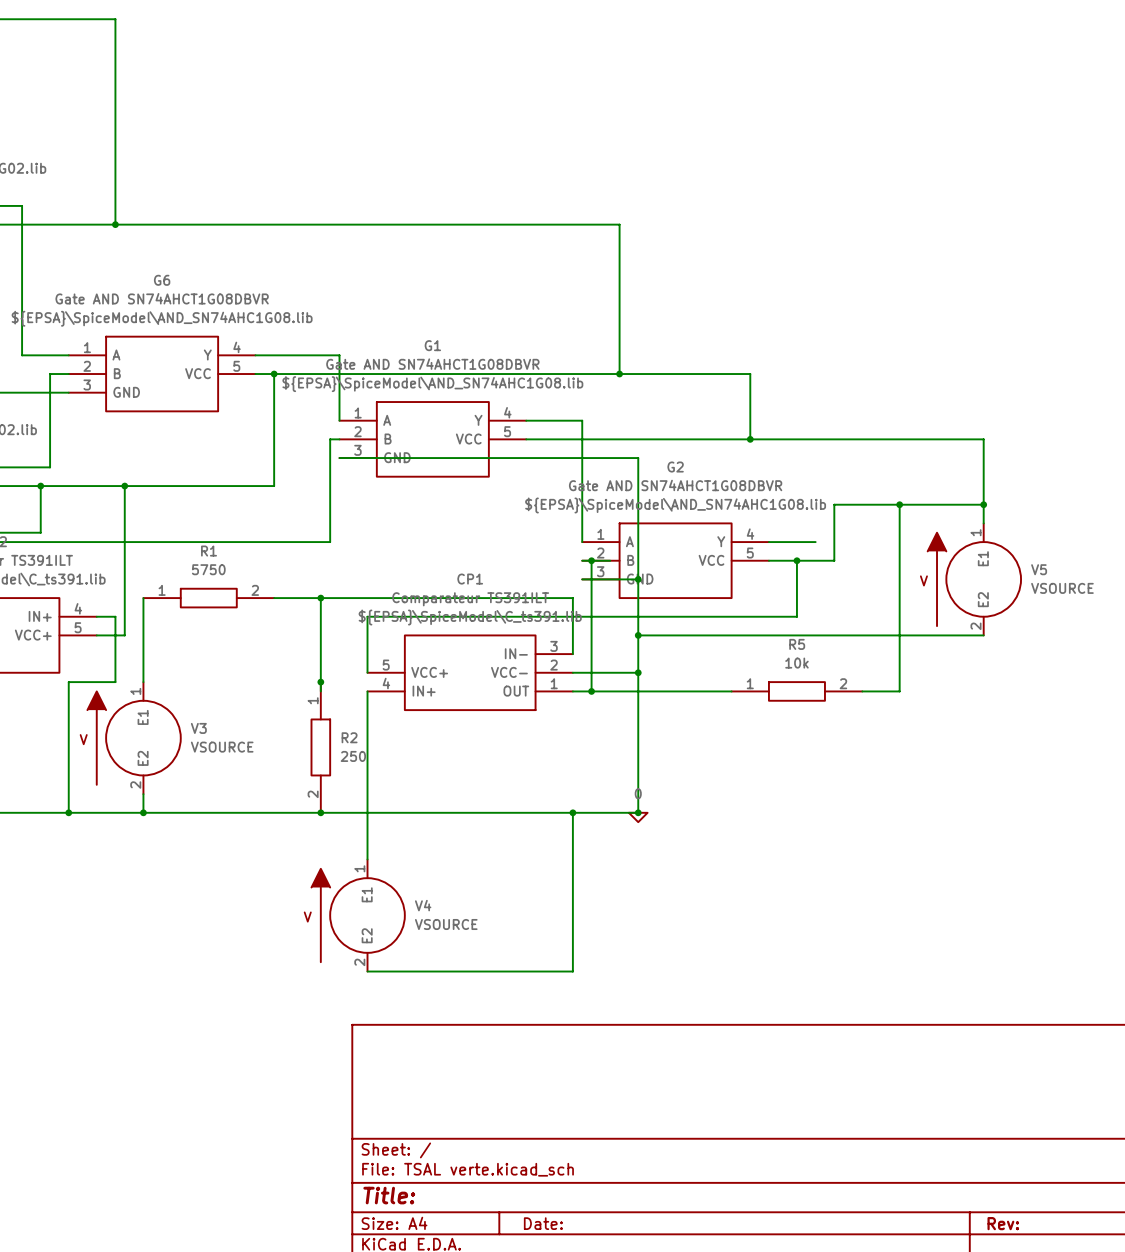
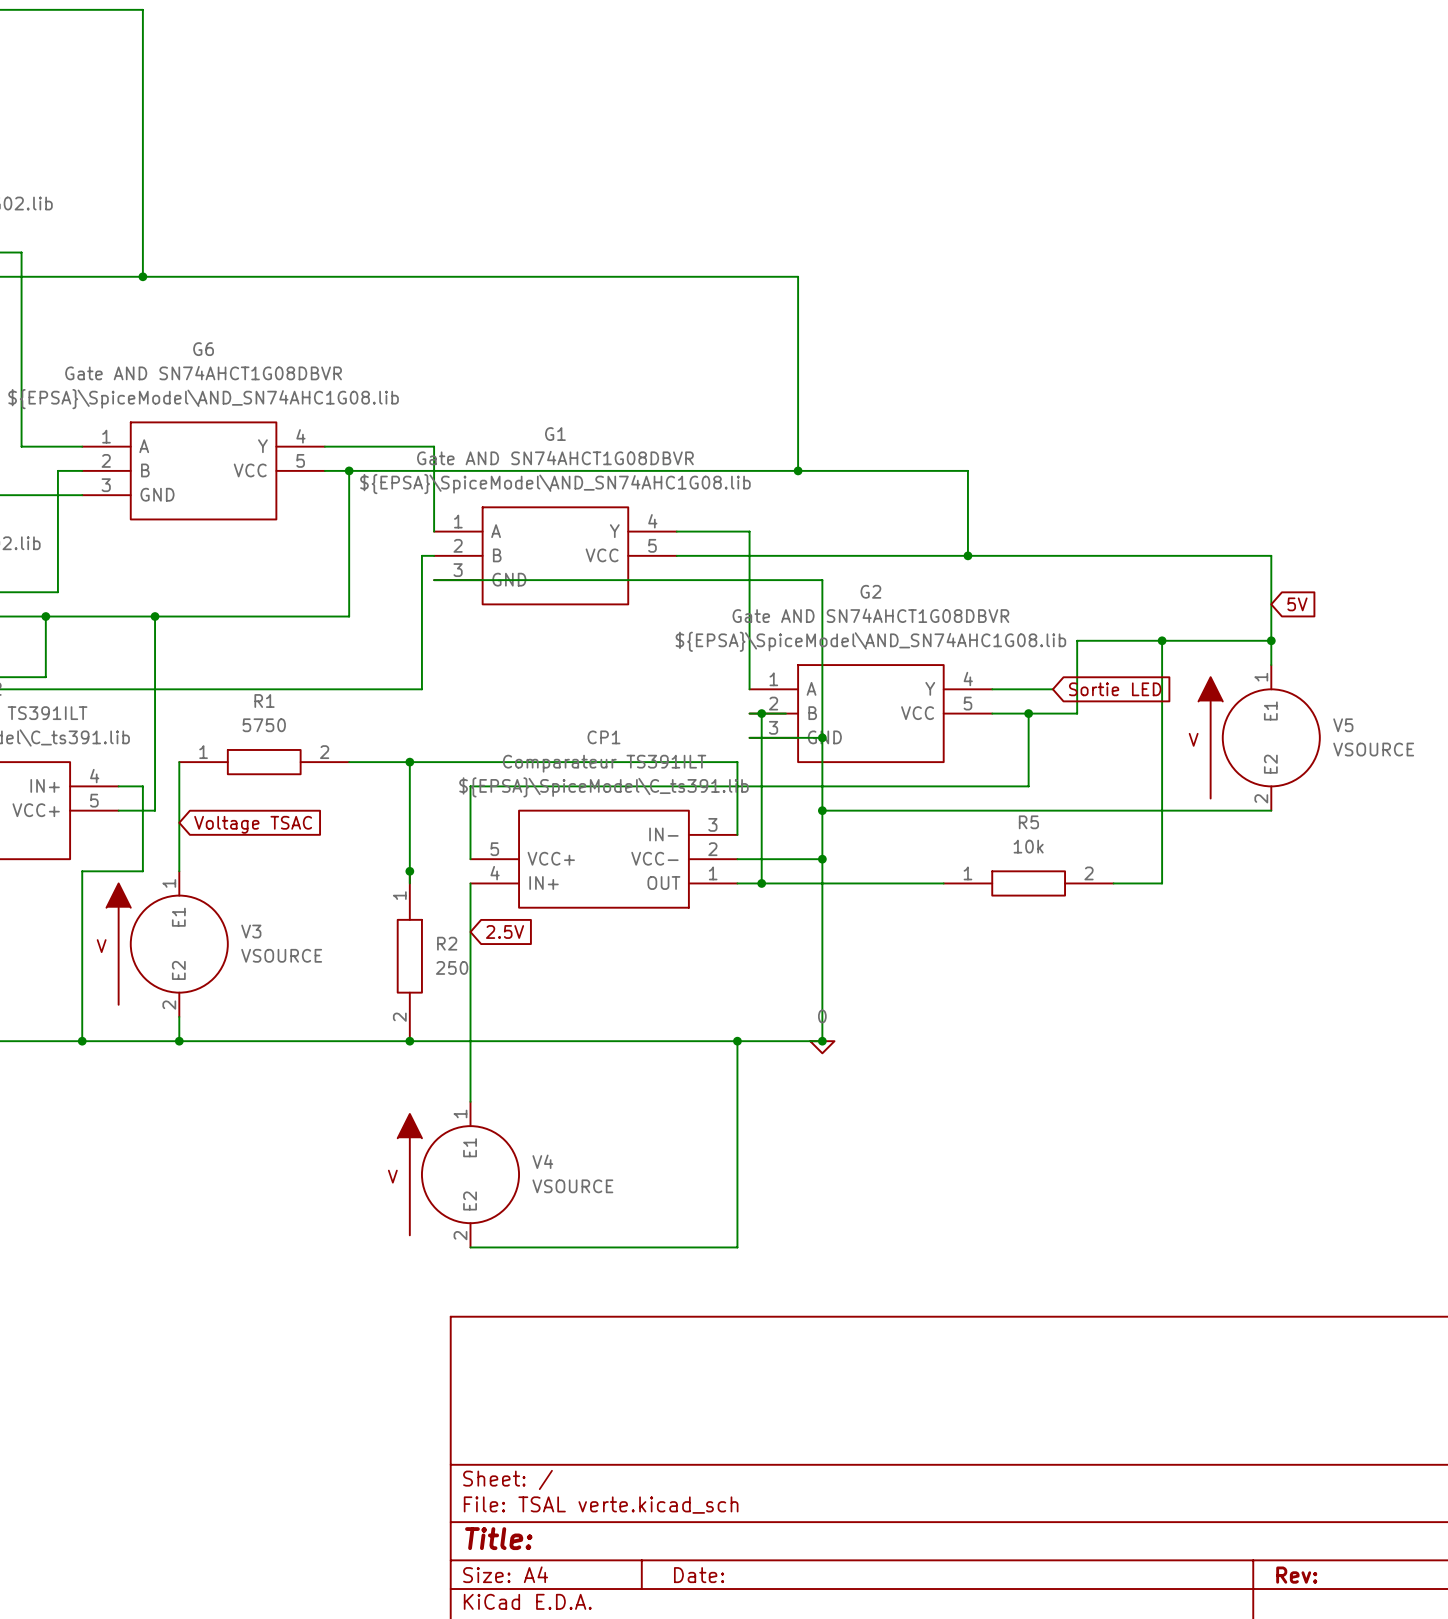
global label: none -> 5V (1297, 604)
global label: none -> Sortie LED (1115, 689)
global label: none -> Voltage TSAC (253, 824)
global label: none -> 2.5V (505, 931)

